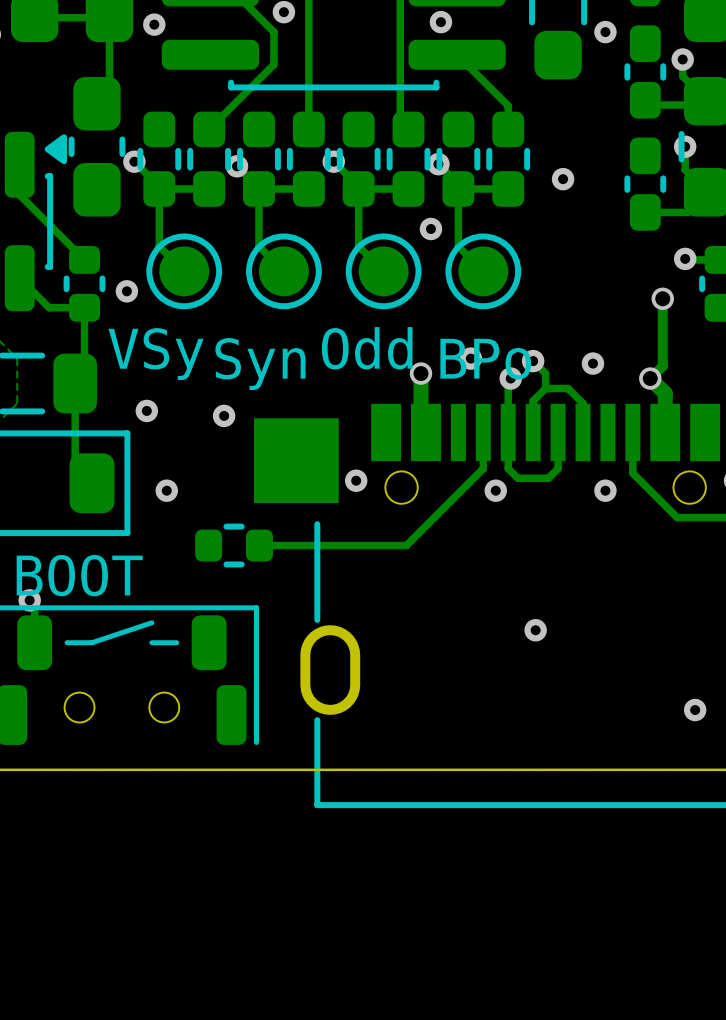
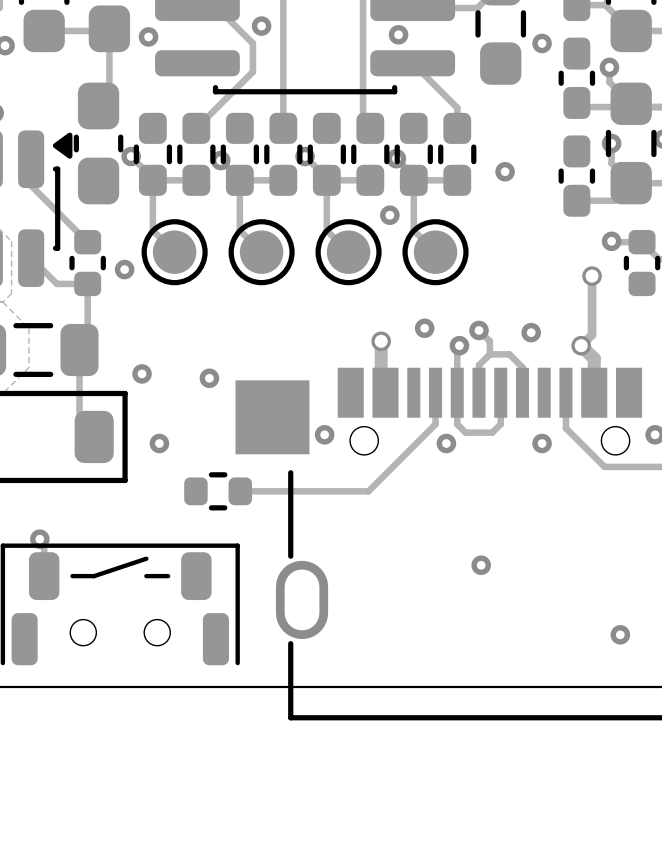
text: Odd (367, 348) -> none
text: VSy (156, 354) -> none
text: BPo (485, 359) -> none
text: Syn (260, 364) -> none
text: BOOT (79, 575) -> none

